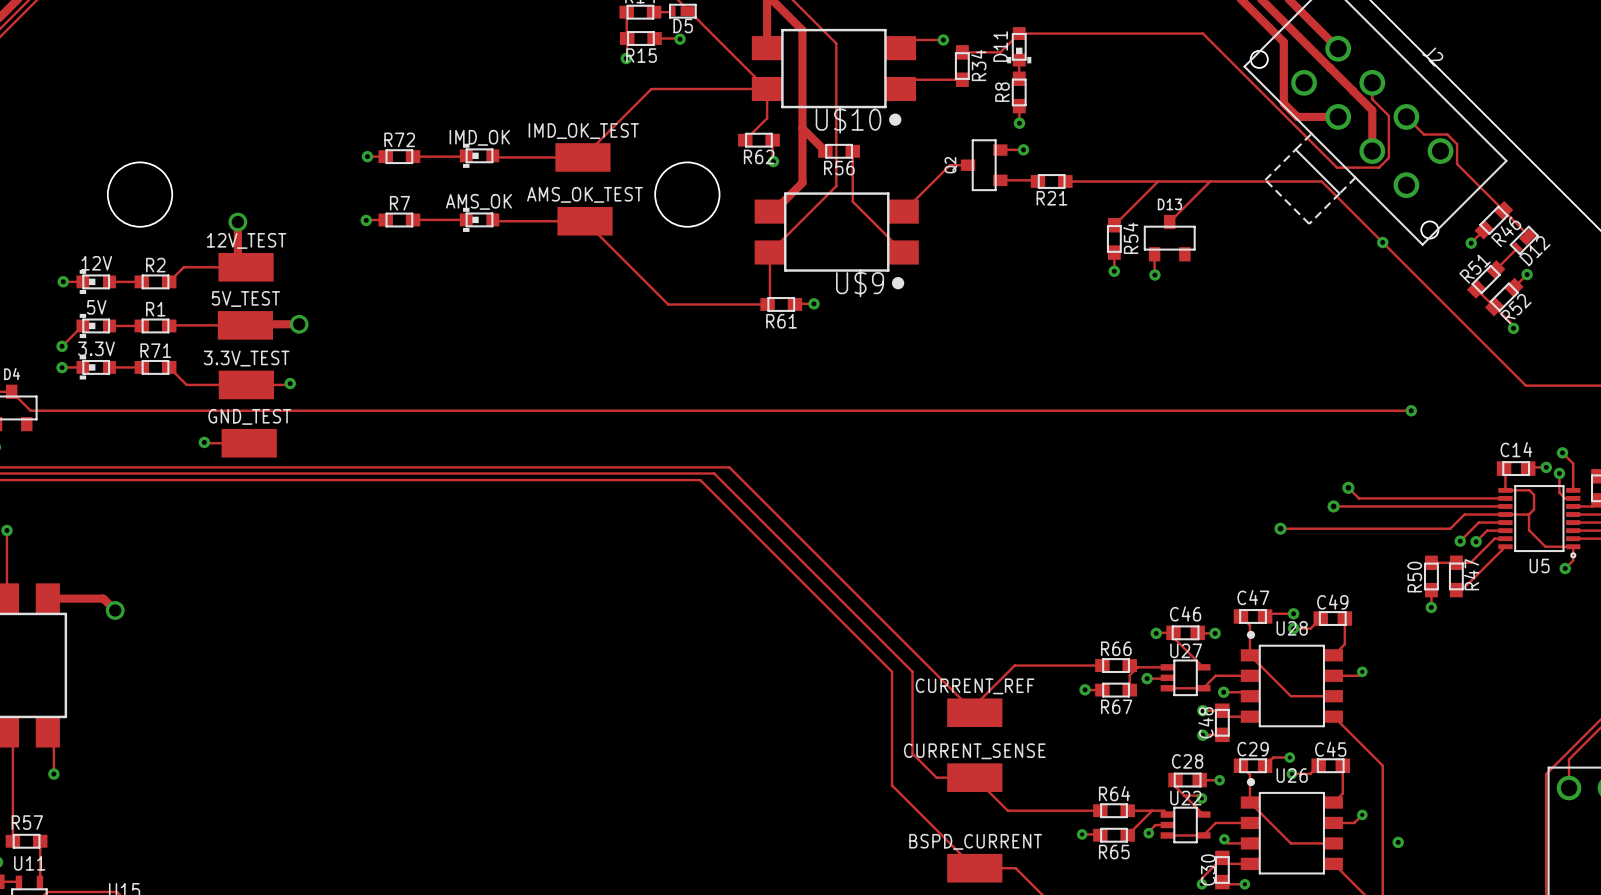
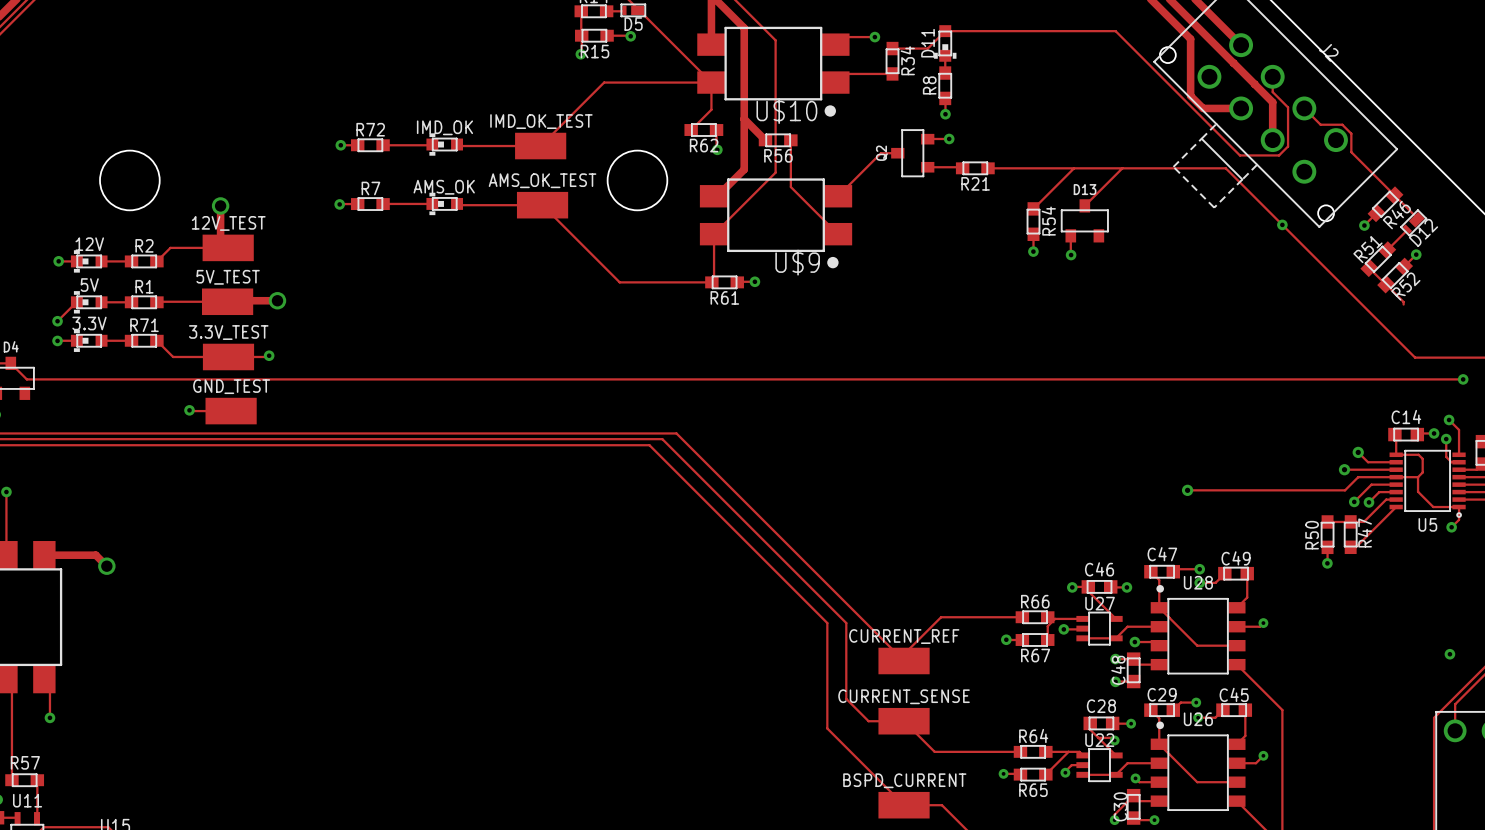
via: (1513, 328) -> none
track: (28, 409) (30, 410) (1411, 410) -> (26, 379) (1463, 379)
via: none -> (1463, 379)
via: (1411, 410) -> none
track: (1348, 487) (1358, 498) (1475, 498) -> (1358, 452) (1368, 462)
via: (1348, 487) -> none
via: none -> (1358, 452)
track: (1333, 506) (1449, 506) -> none
via: (1333, 506) -> none
via: none -> (1344, 469)
via: none -> (1449, 654)
via: (1398, 842) -> none

